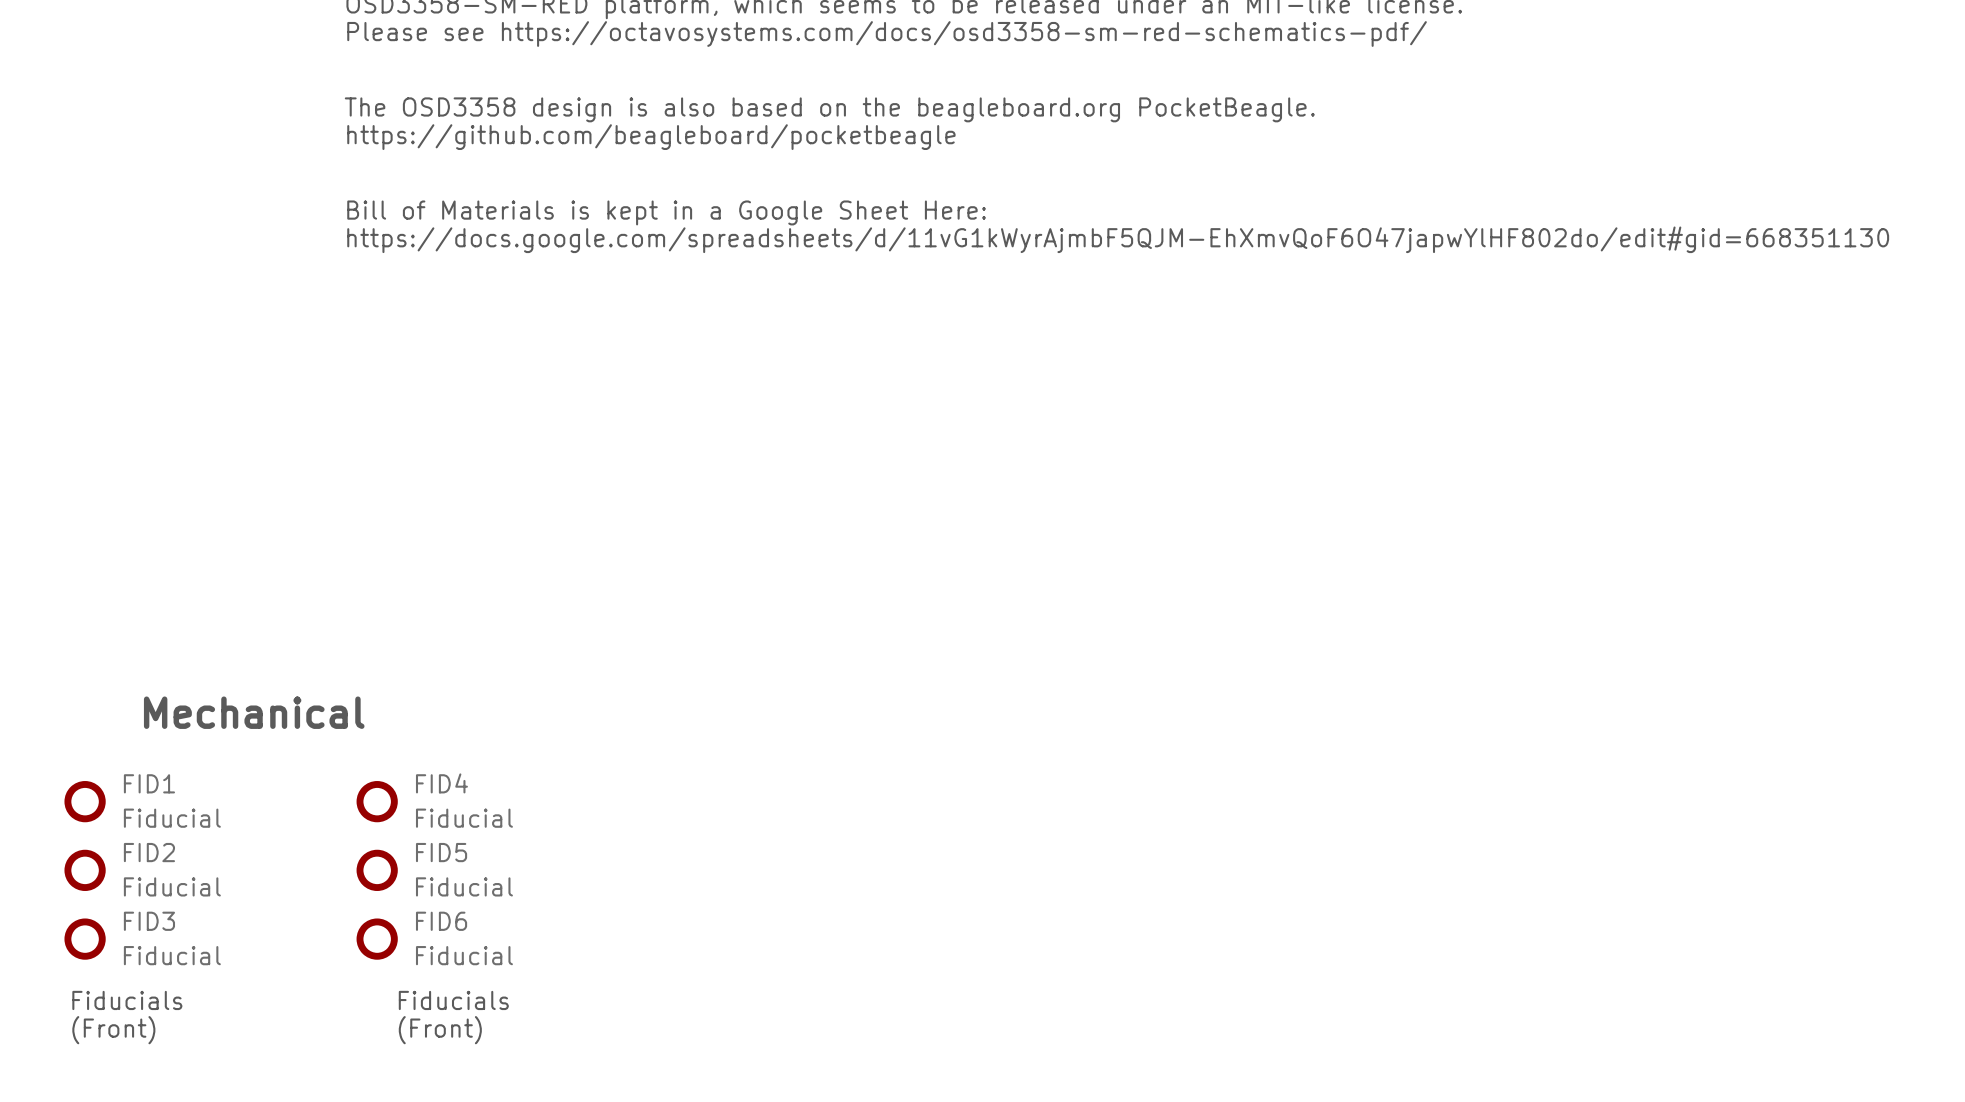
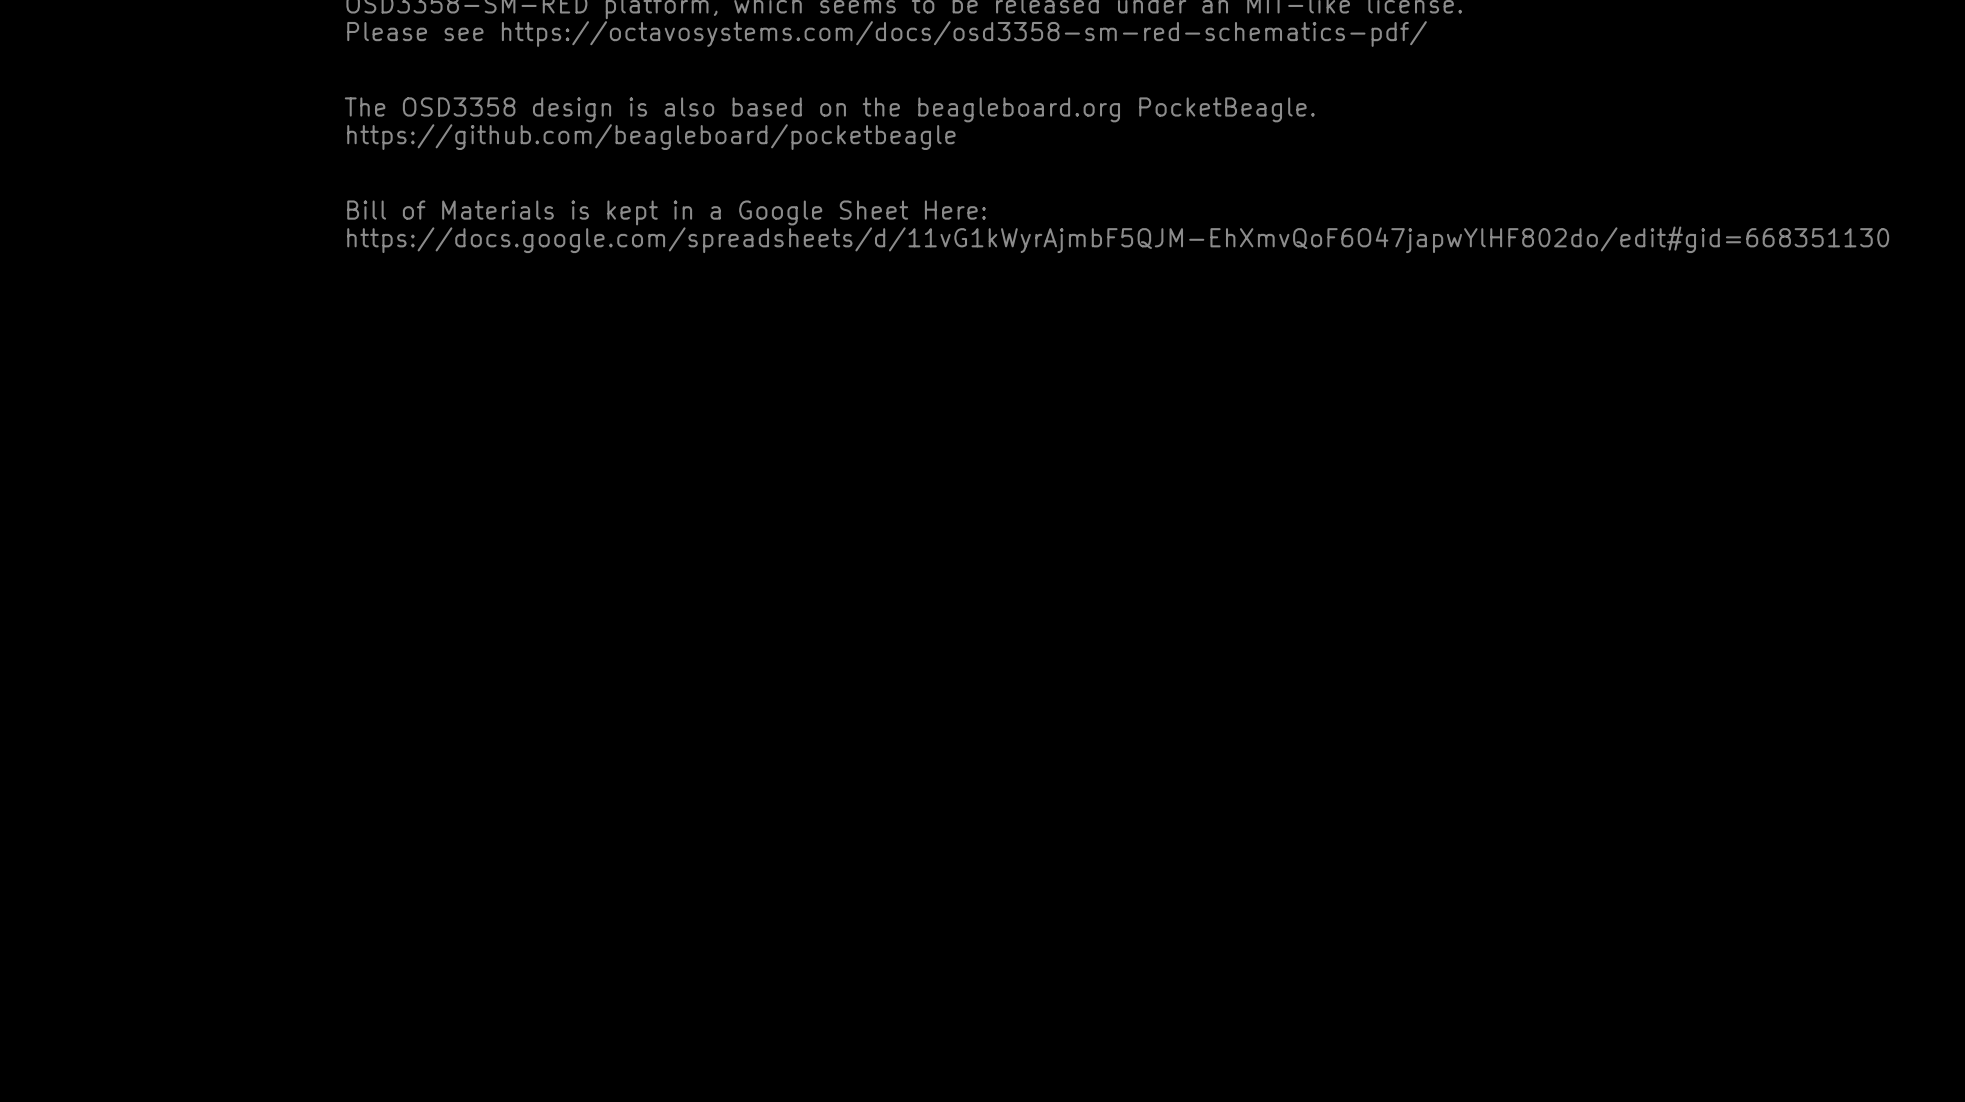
text: Mechanical (254, 712) -> none
FID1: Fiducial (85, 801) -> none
FID4: Fiducial (377, 801) -> none
FID2: Fiducial (85, 870) -> none
FID5: Fiducial (377, 870) -> none
FID3: Fiducial (85, 939) -> none
FID6: Fiducial (377, 939) -> none
text: Fiducials (127, 1000) -> none
text: Fiducials (453, 1000) -> none
text: (Front) (113, 1030) -> none
text: (Front) (440, 1030) -> none

